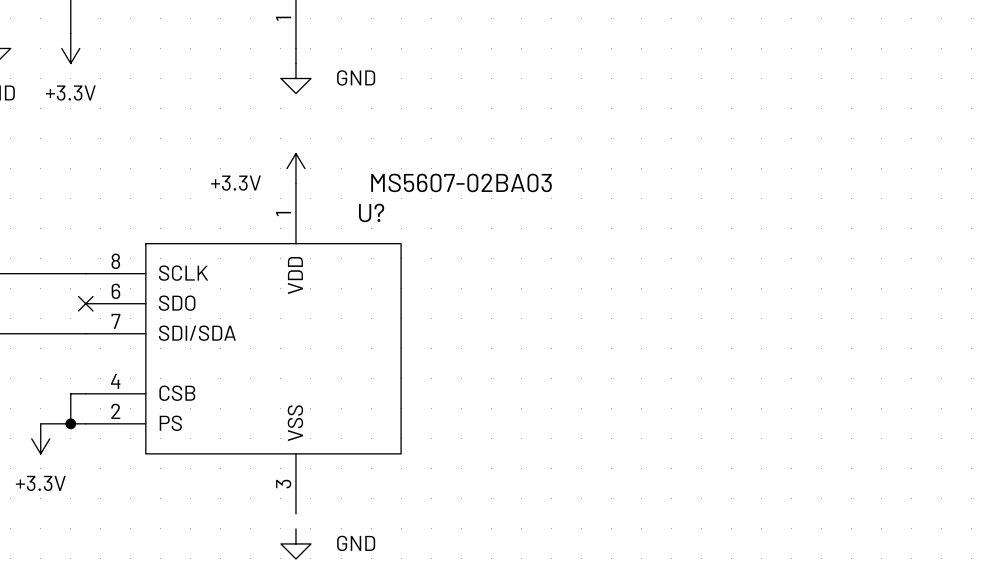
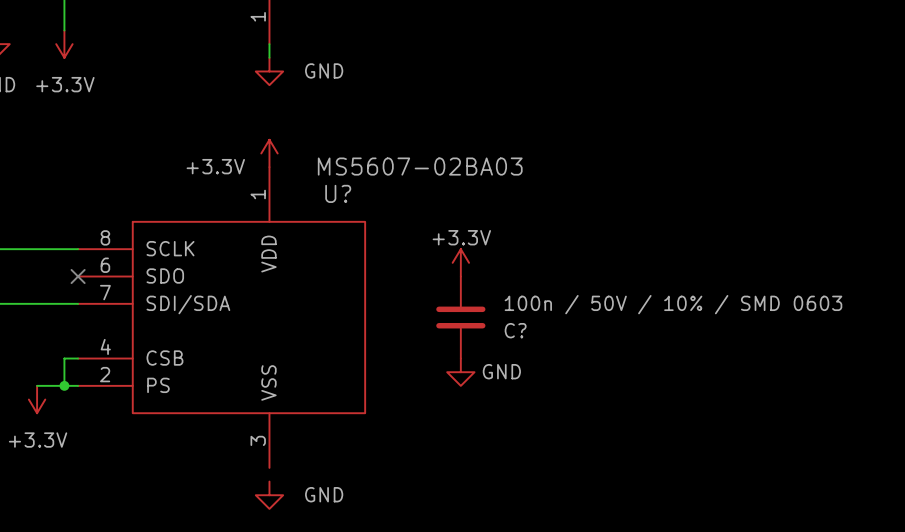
power symbol: none -> +3.3V (460, 262)
C?: none -> 100n / 50V / 10% / SMD 0603 (460, 317)
power symbol: none -> GND (460, 372)

